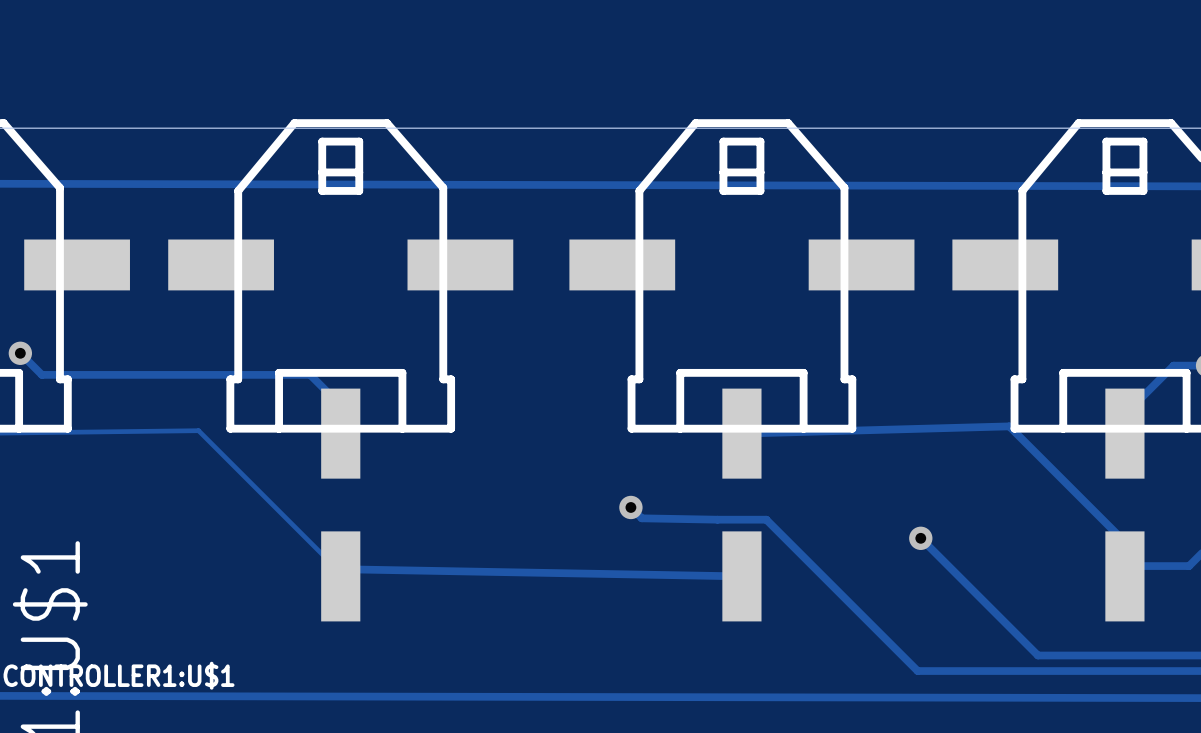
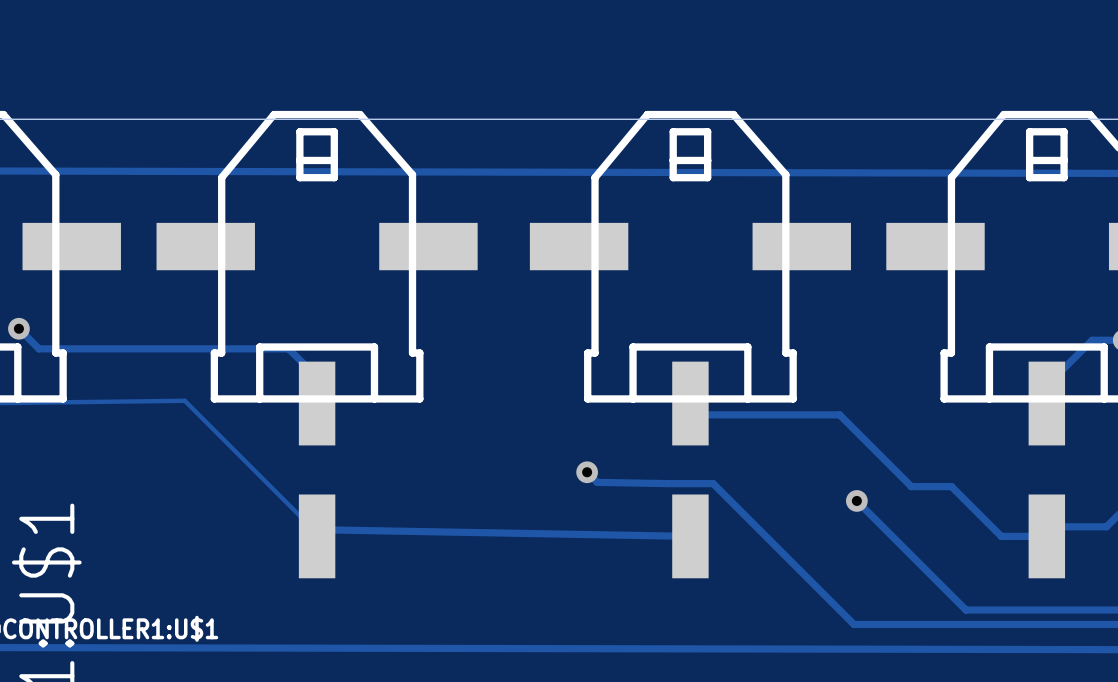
track: (741, 433) (1009, 426) (1130, 547) -> (690, 403) (701, 414) (839, 414) (911, 486) (951, 486) (1001, 536) (1046, 536)

